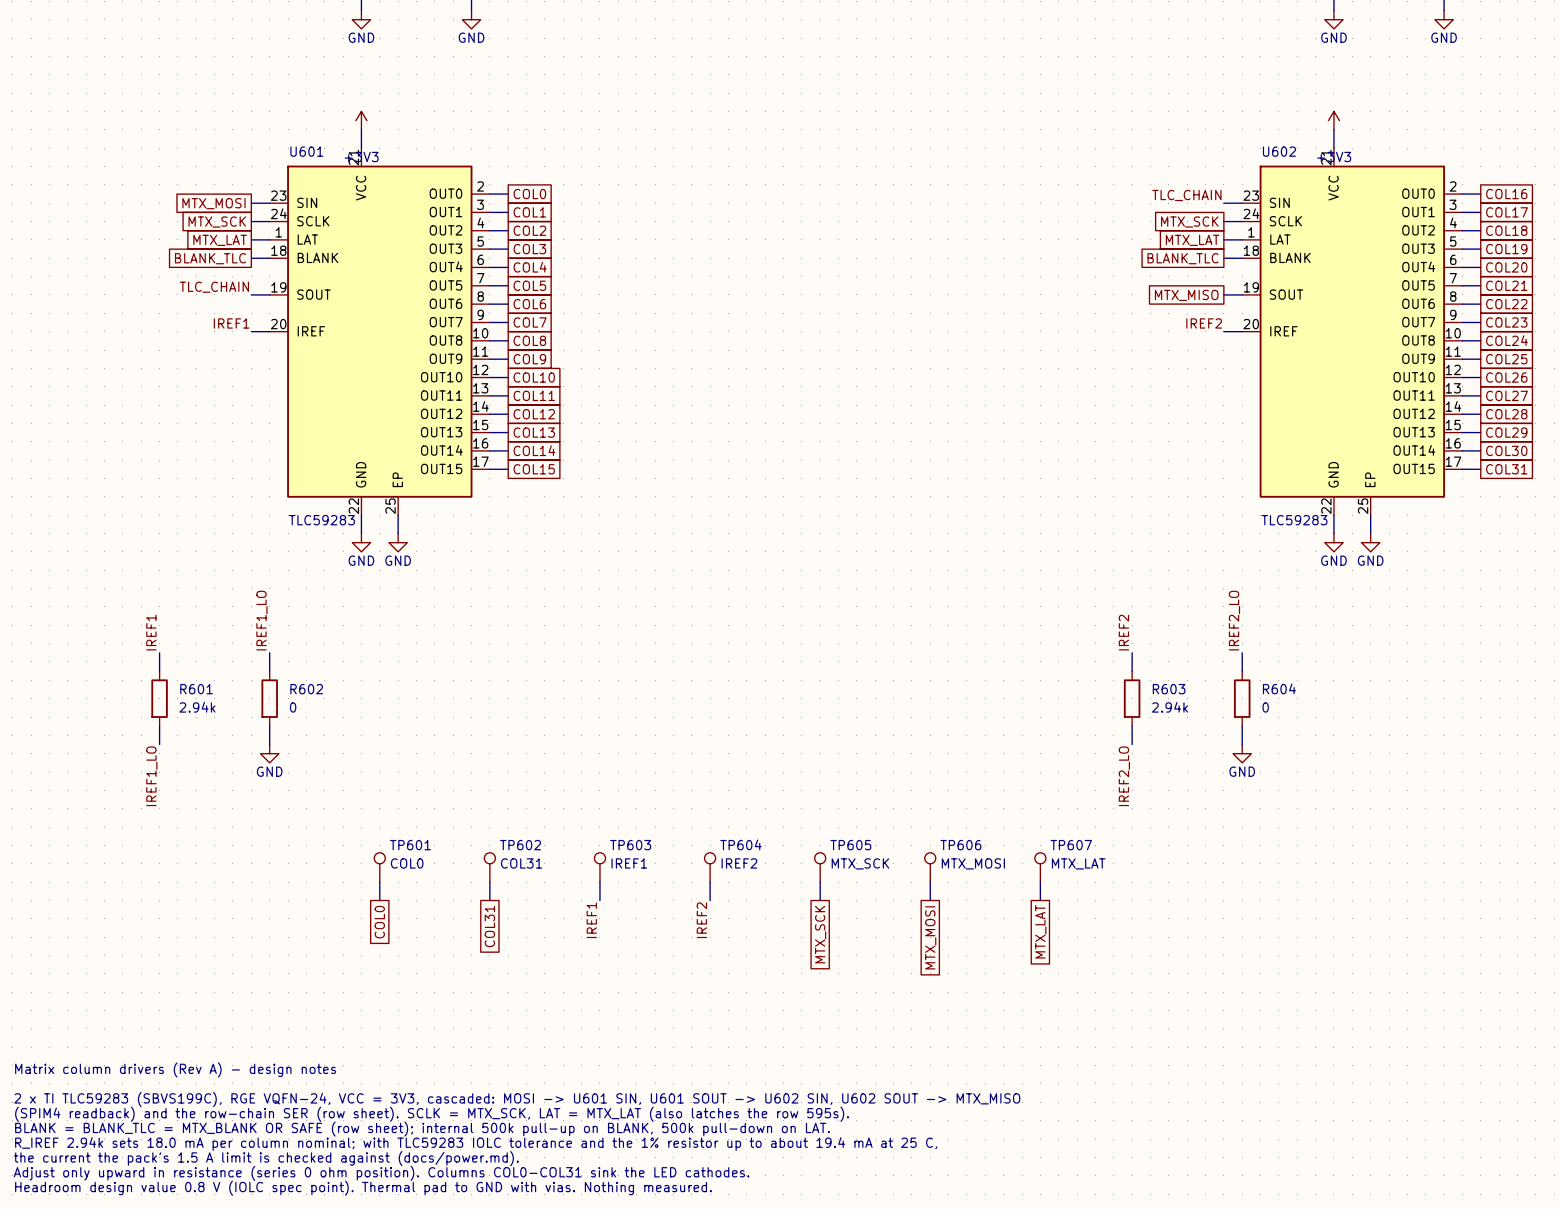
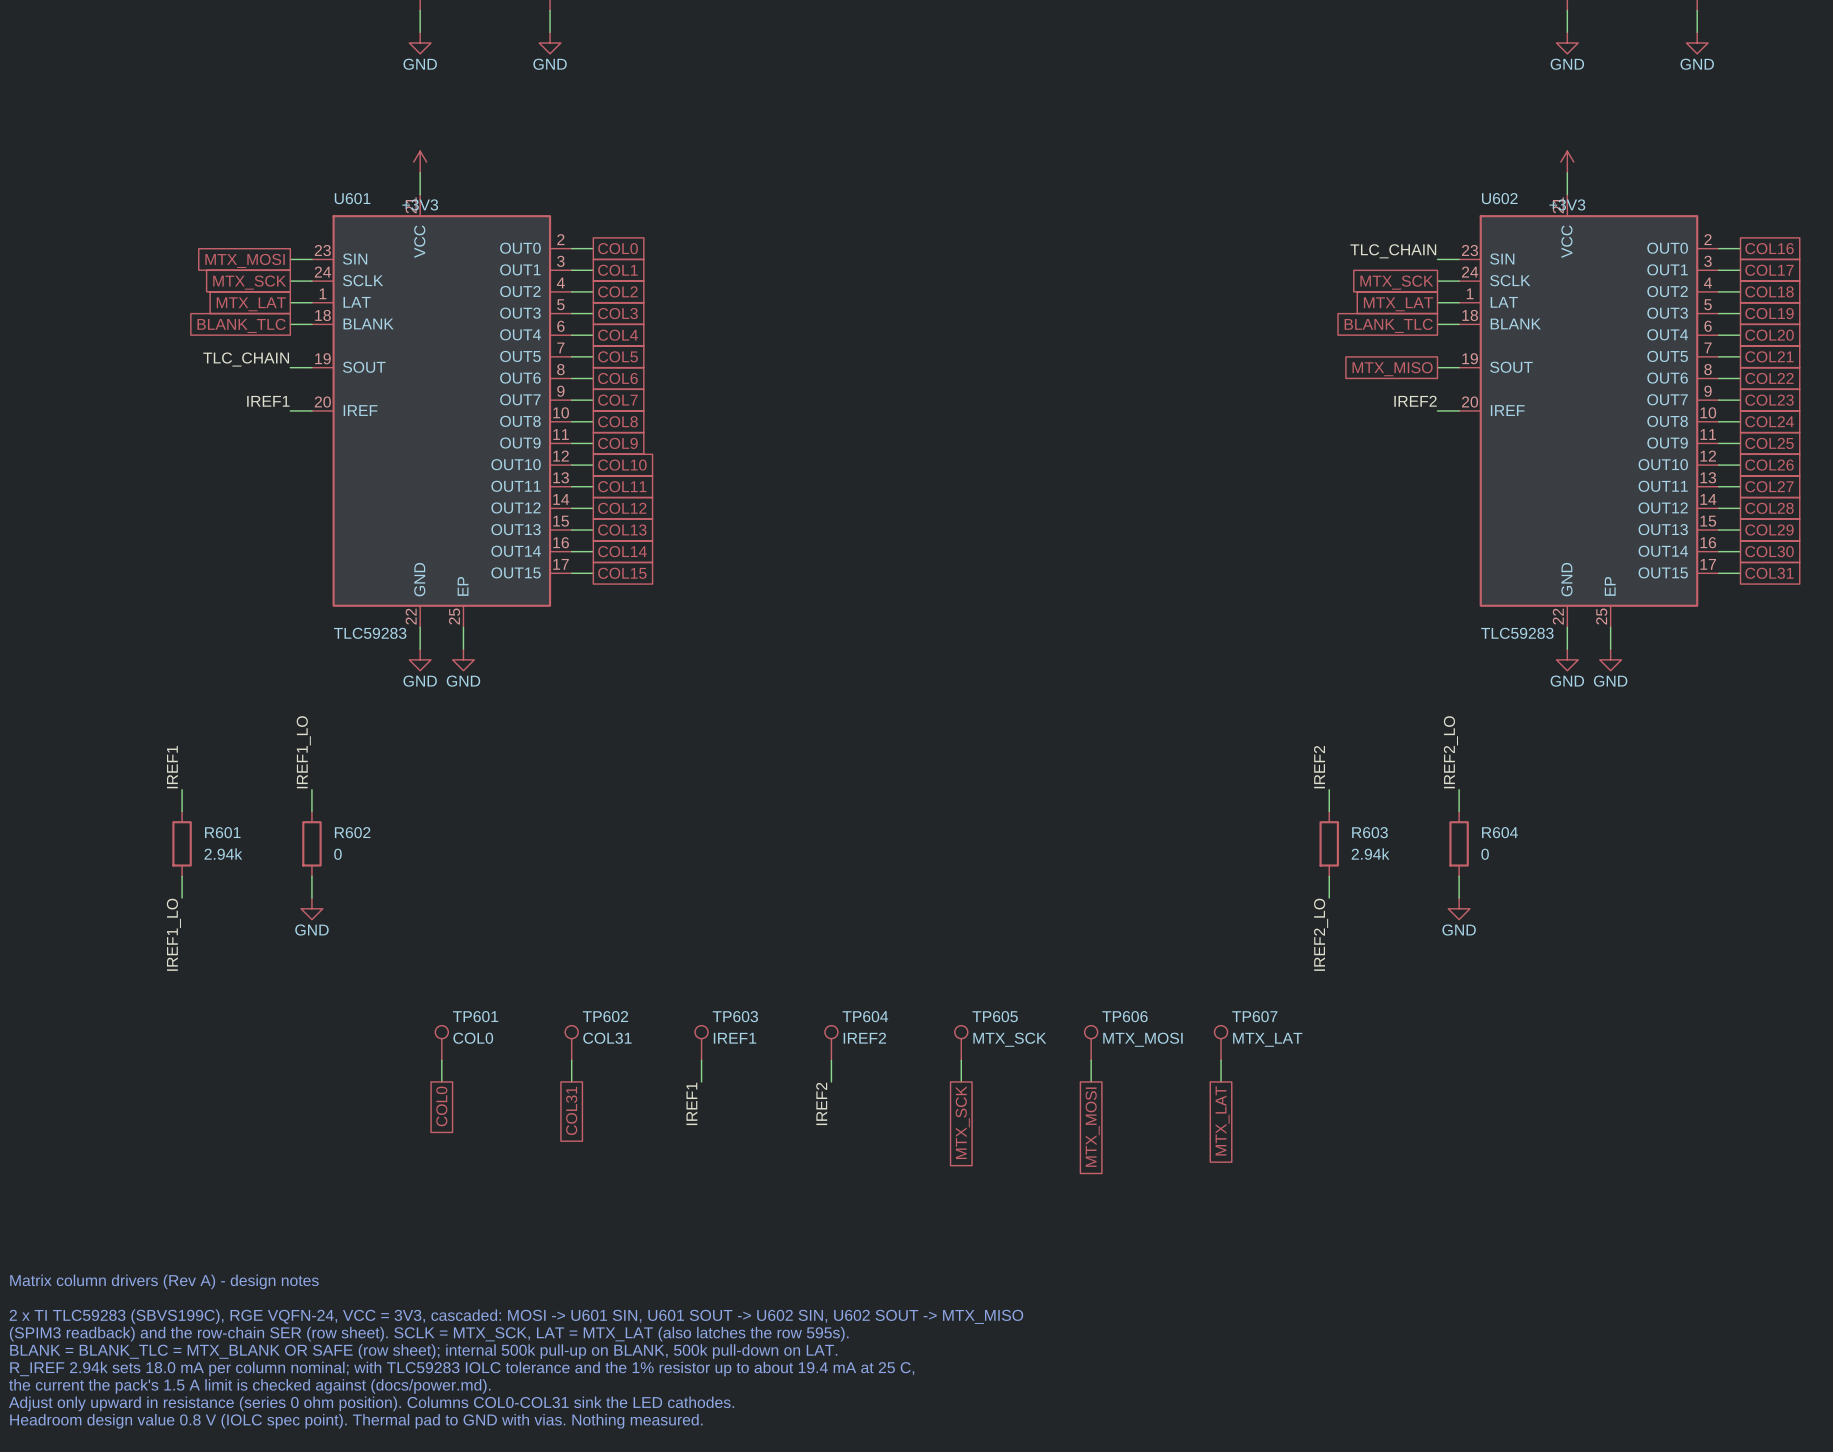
text: (SPIM4 readback) and the row-chain SER (row sheet). SCLK = MTX_SCK, LAT = MTX_LAT (also latches the row 595s). (432, 1114) -> (SPIM3 readback) and the row-chain SER (row sheet). SCLK = MTX_SCK, LAT = MTX_LAT (also latches the row 595s). (429, 1334)

